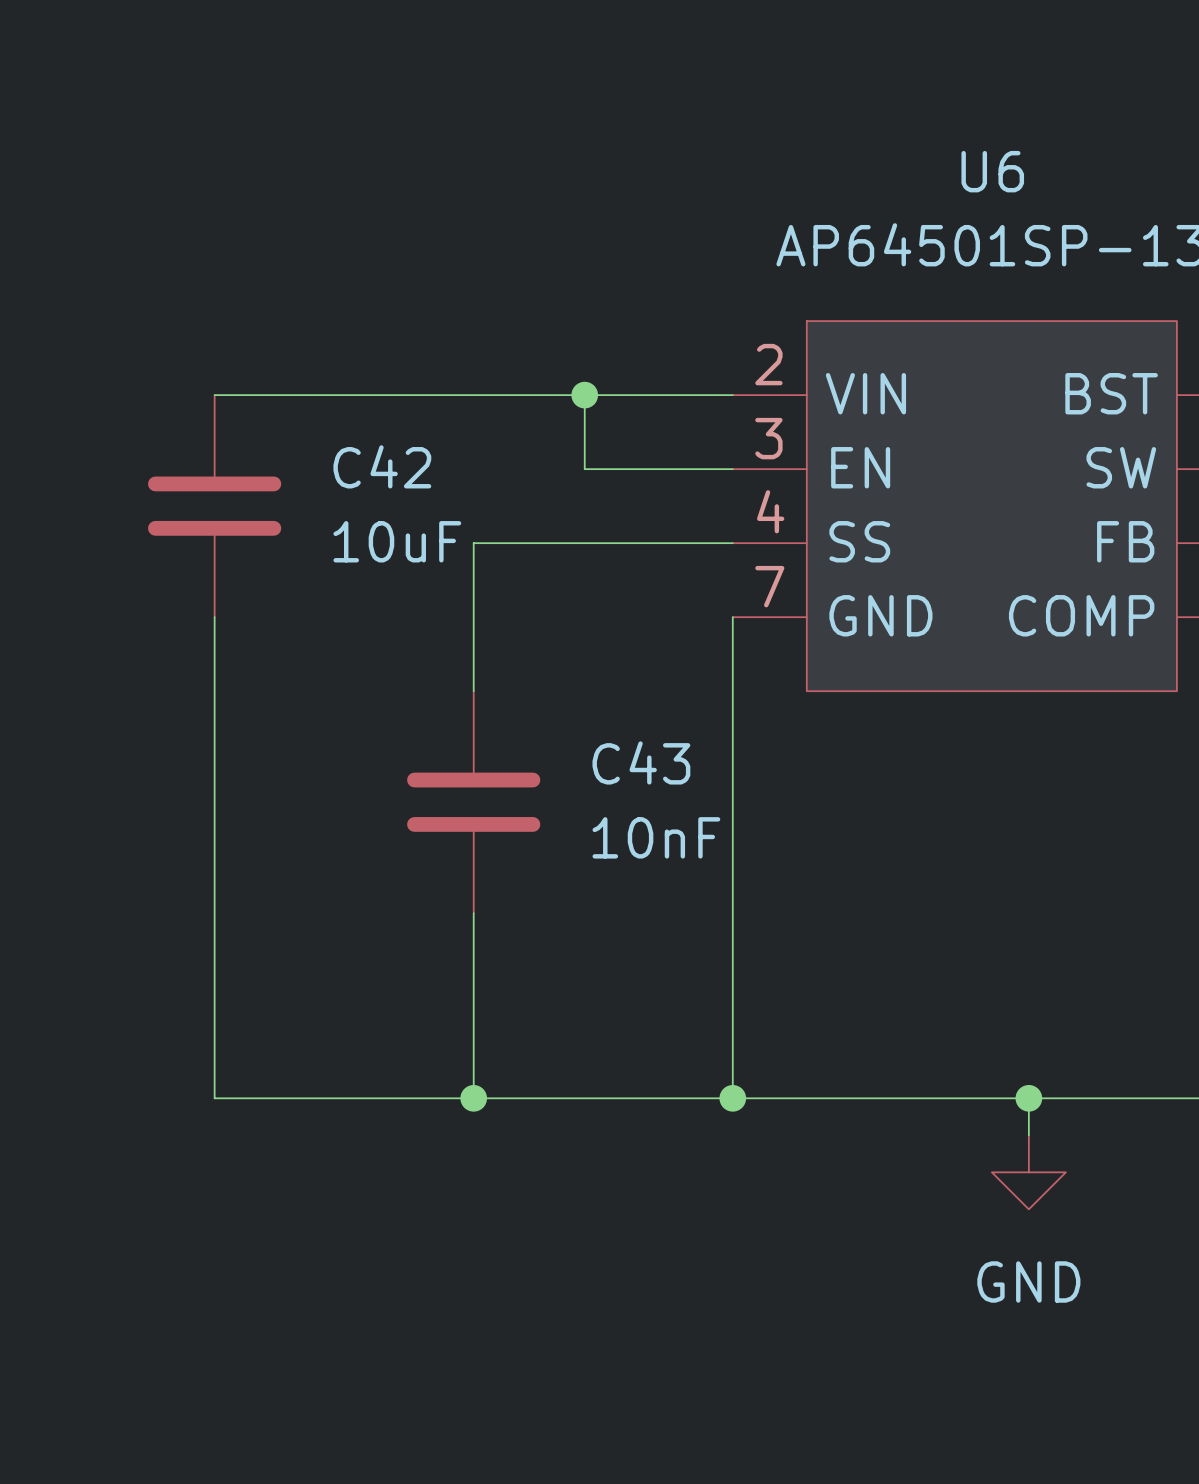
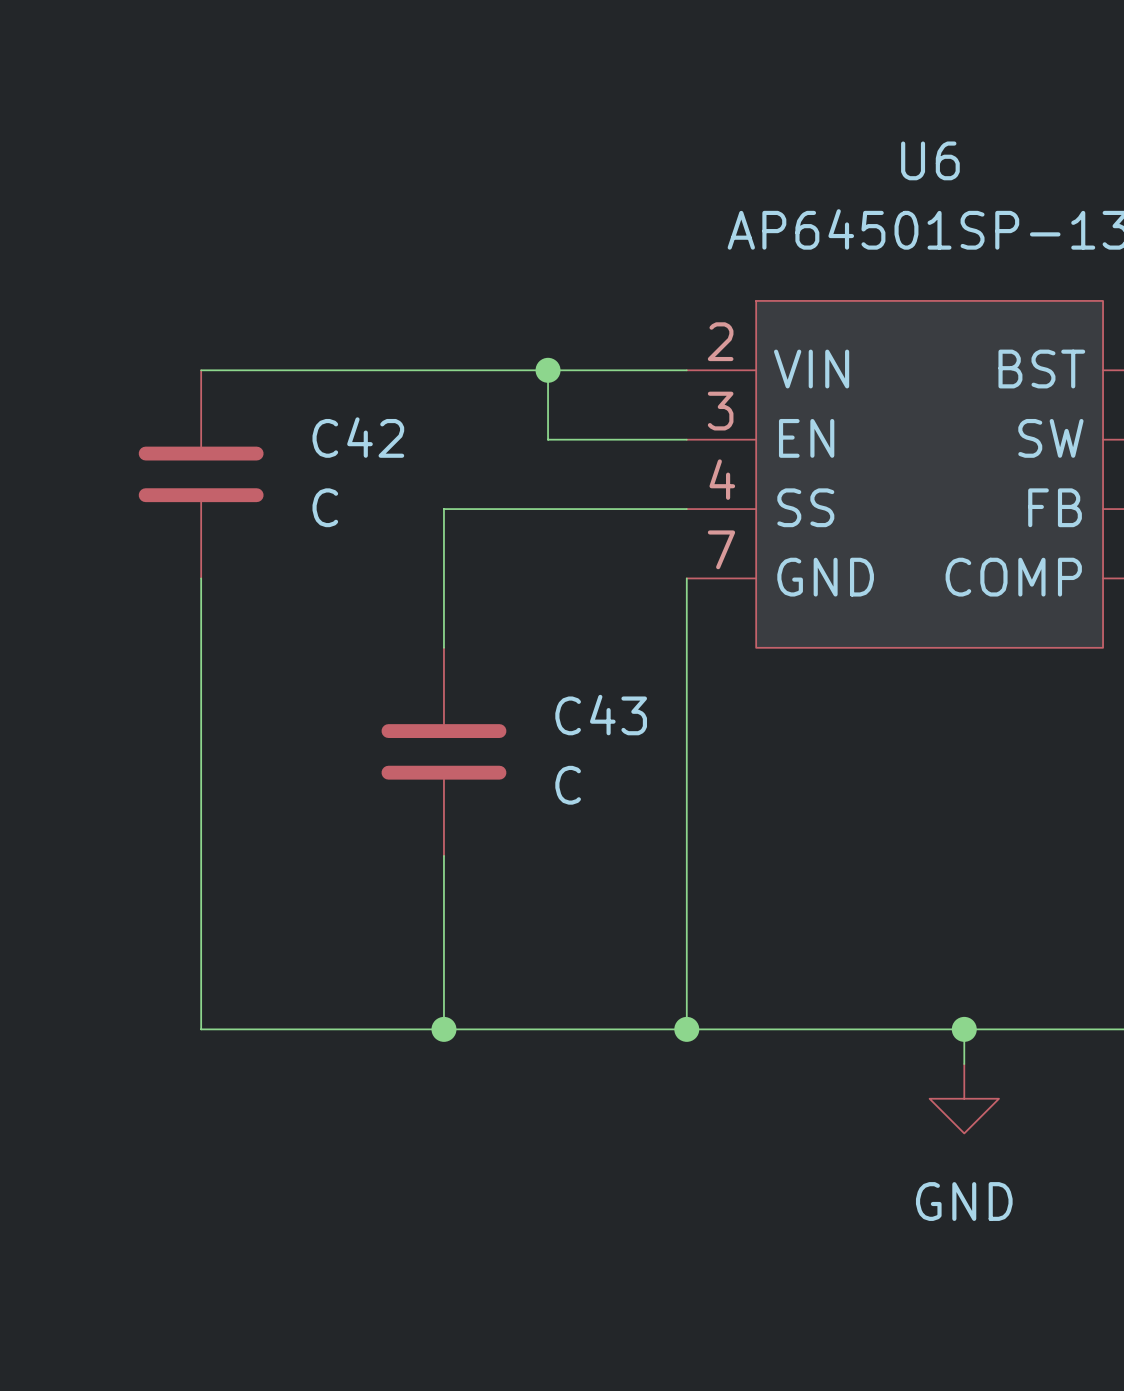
C42 value: 10uF (397, 541) -> C (325, 507)
C43 value: 10nF (656, 837) -> C (568, 785)

